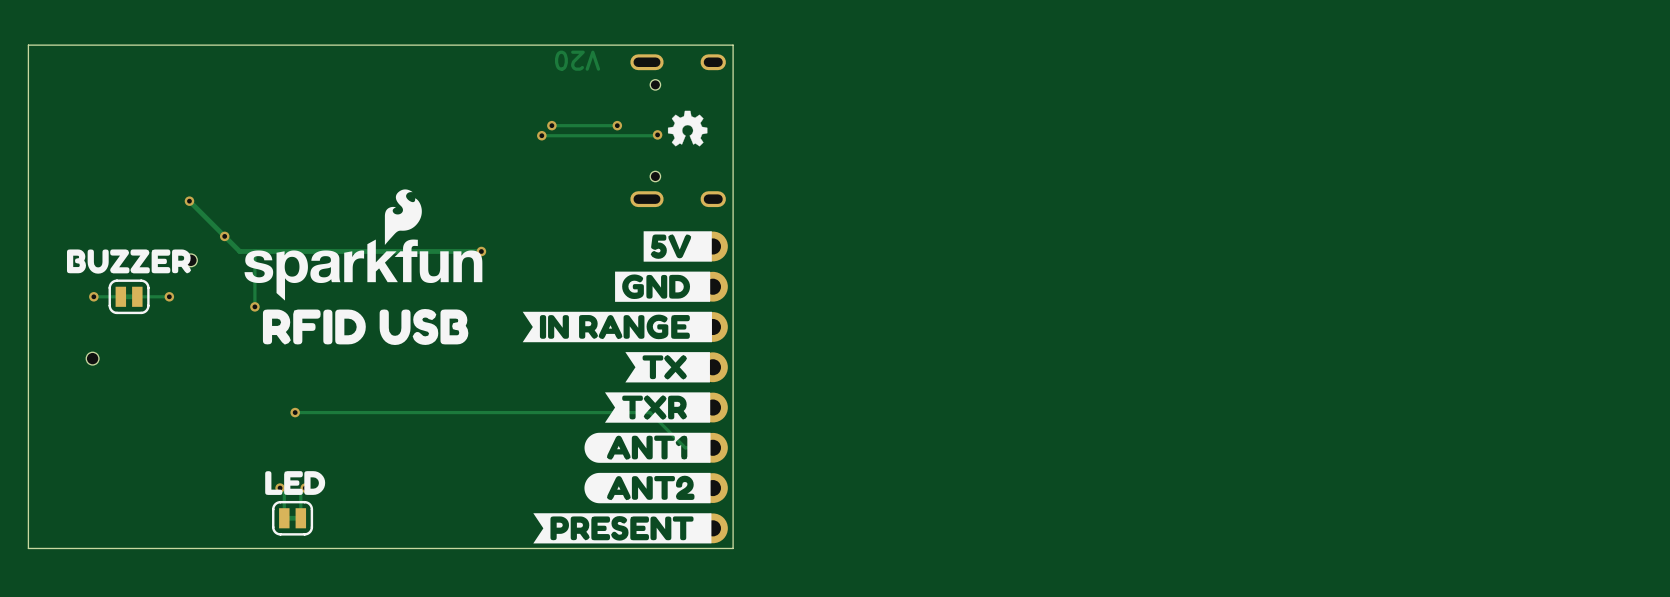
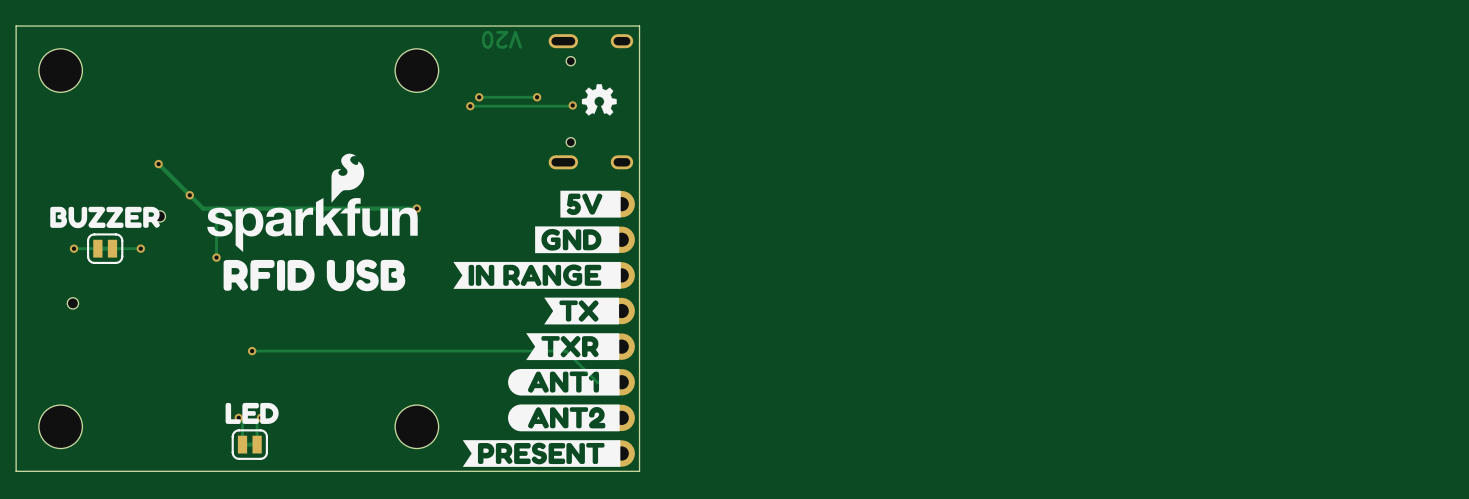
part: none -> (60, 70)
part: none -> (416, 70)
part: none -> (60, 426)
part: none -> (416, 426)

